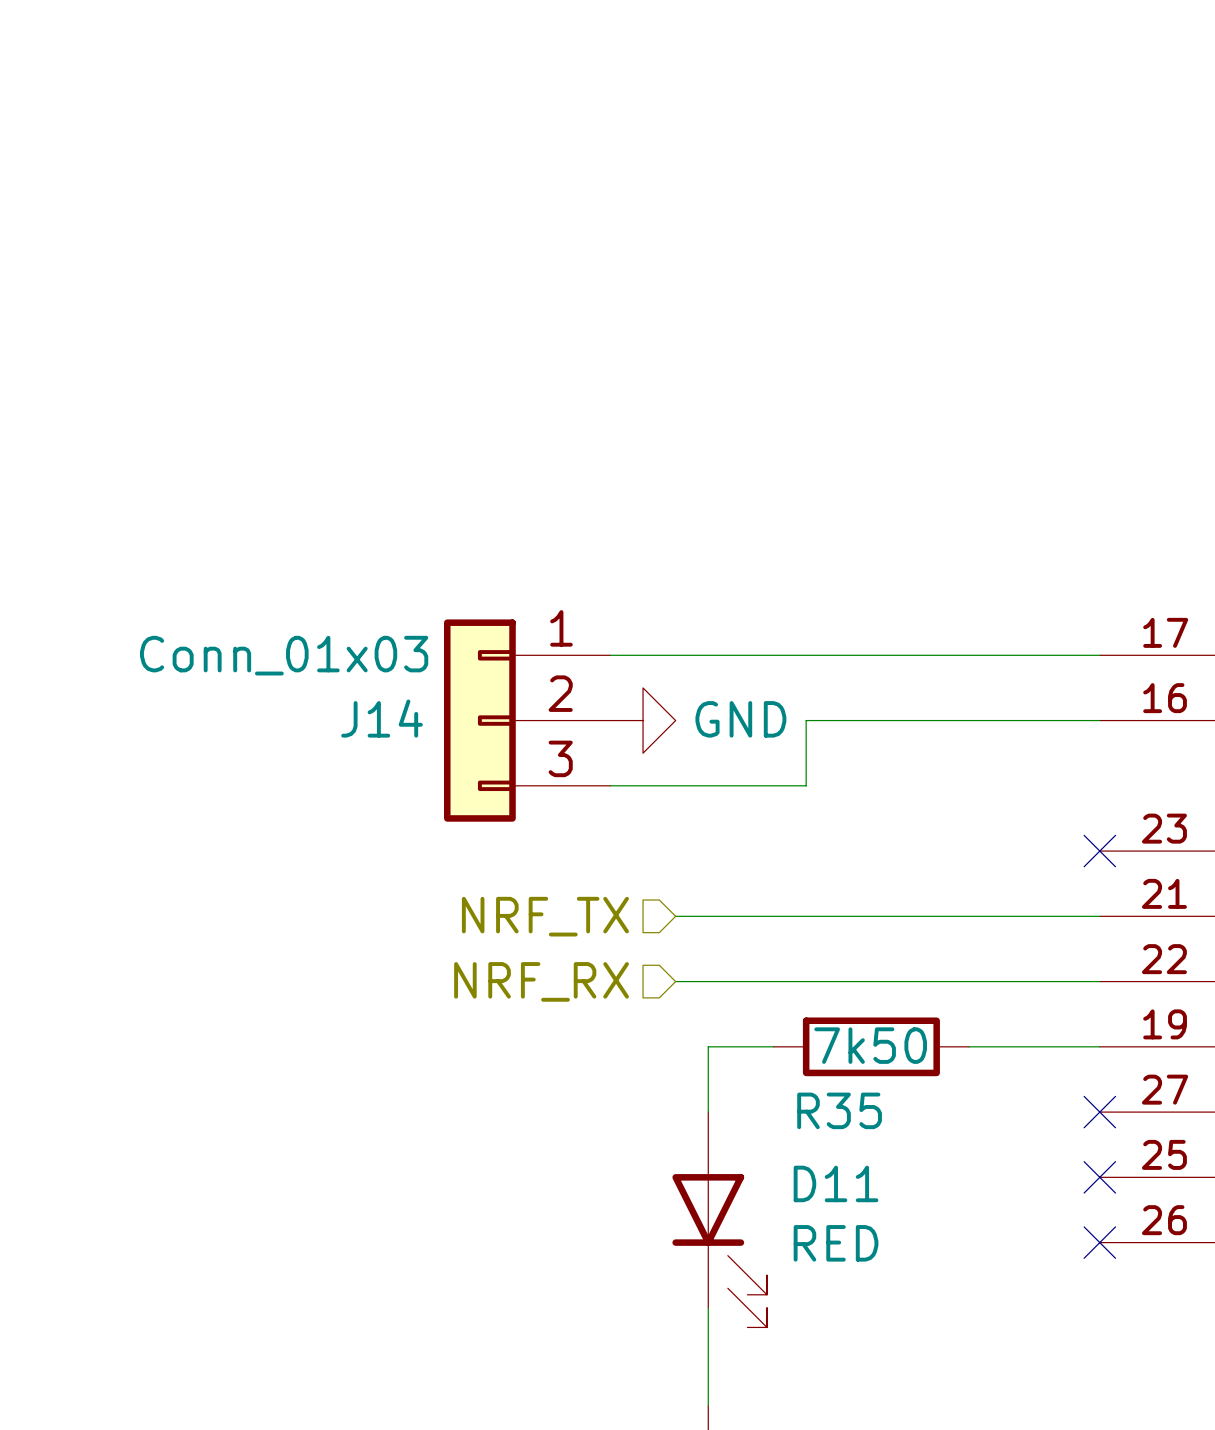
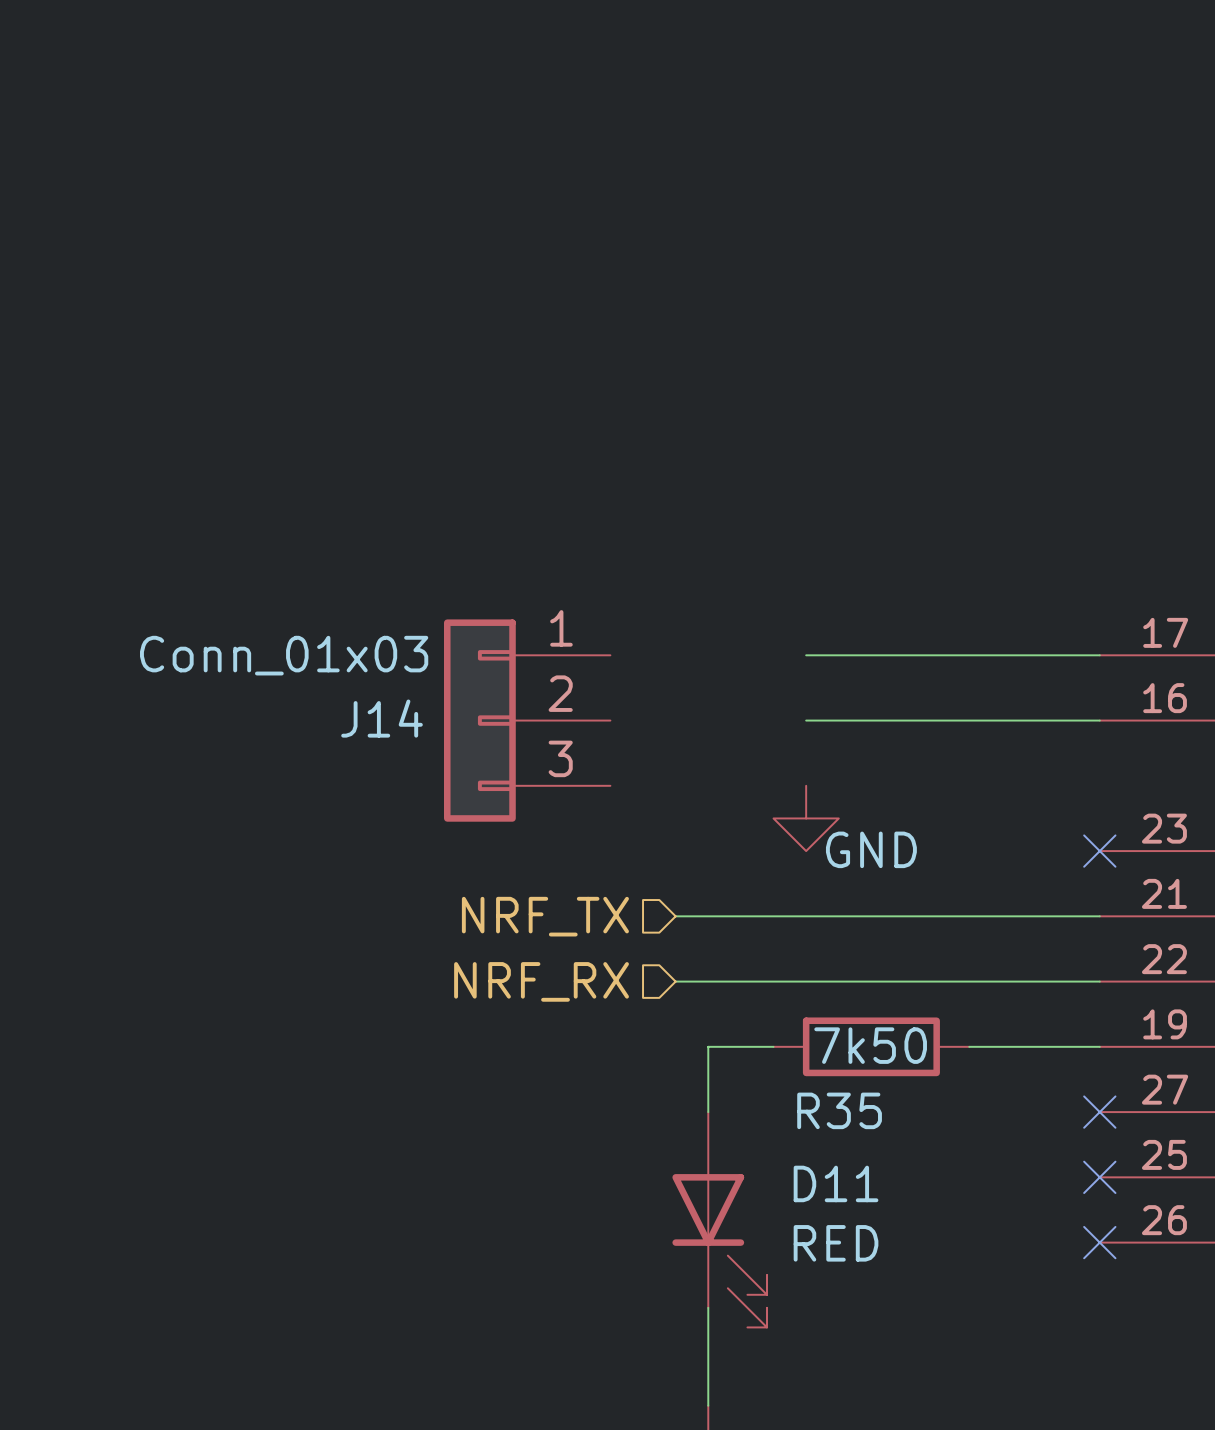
wire: (610, 655) (806, 655) -> none
power symbol rotation: 0° (643, 720) -> 90° clockwise (806, 818)
power symbol position: GND (643, 720) -> GND (806, 818)
wire: (806, 720) (806, 785) (610, 785) -> none

